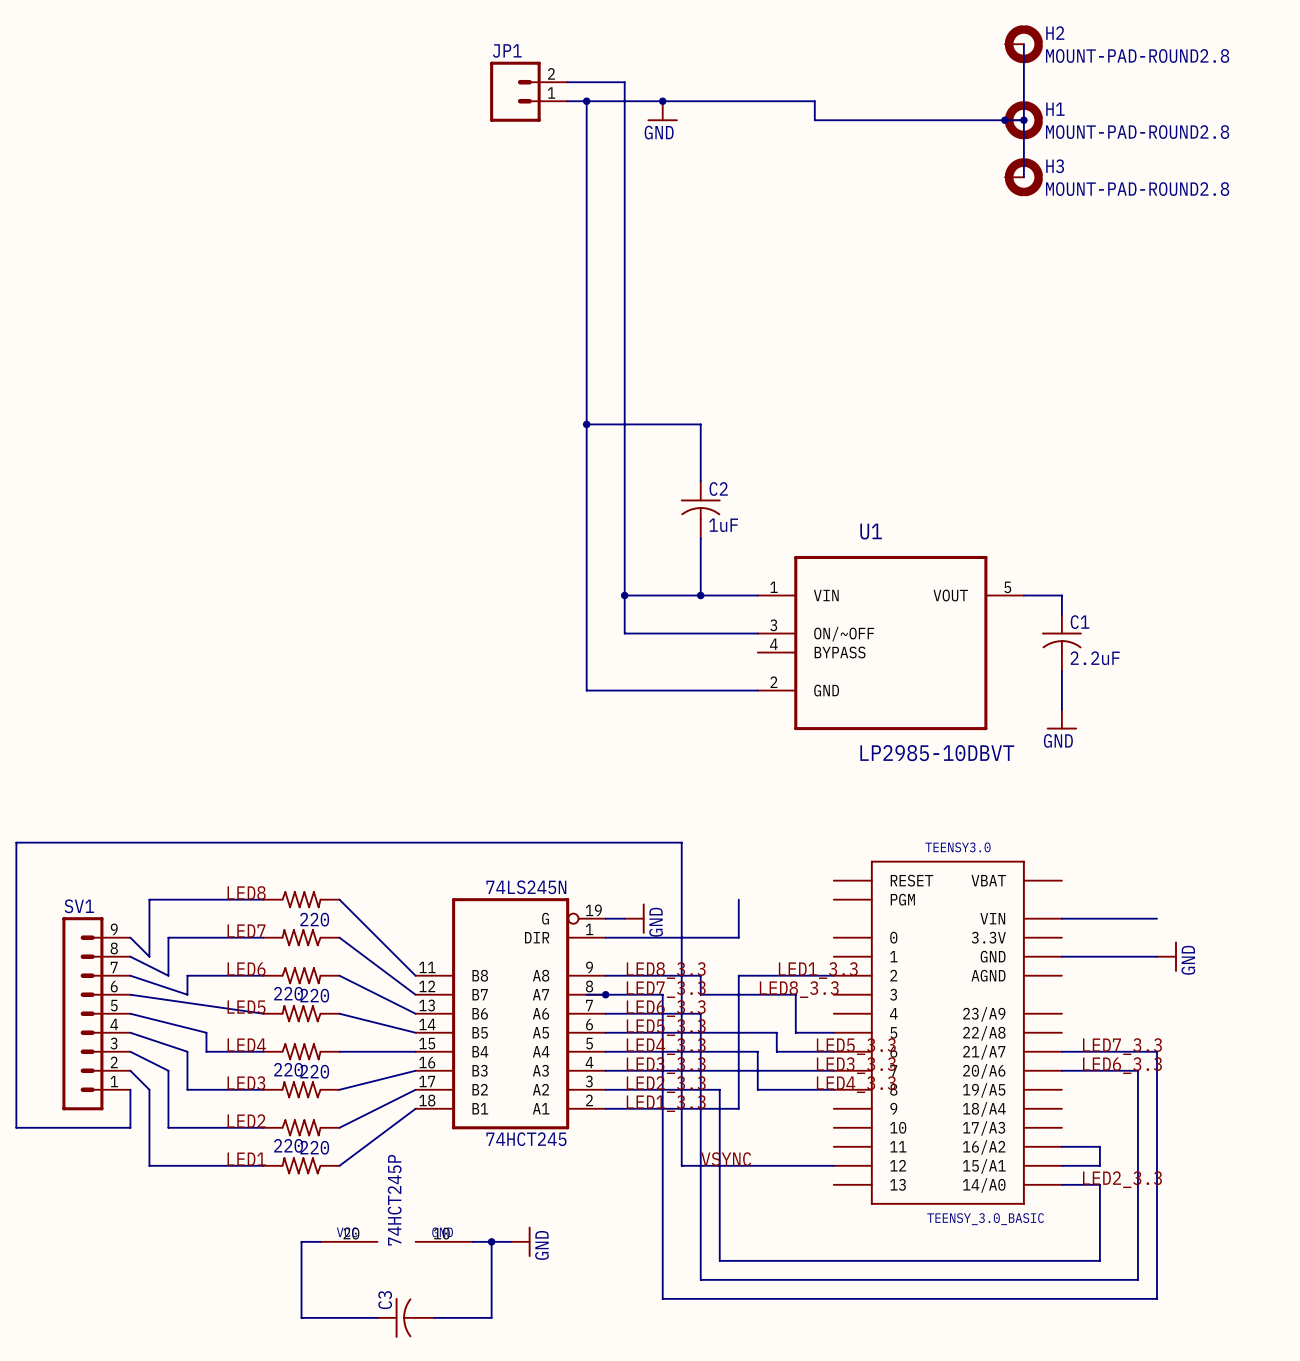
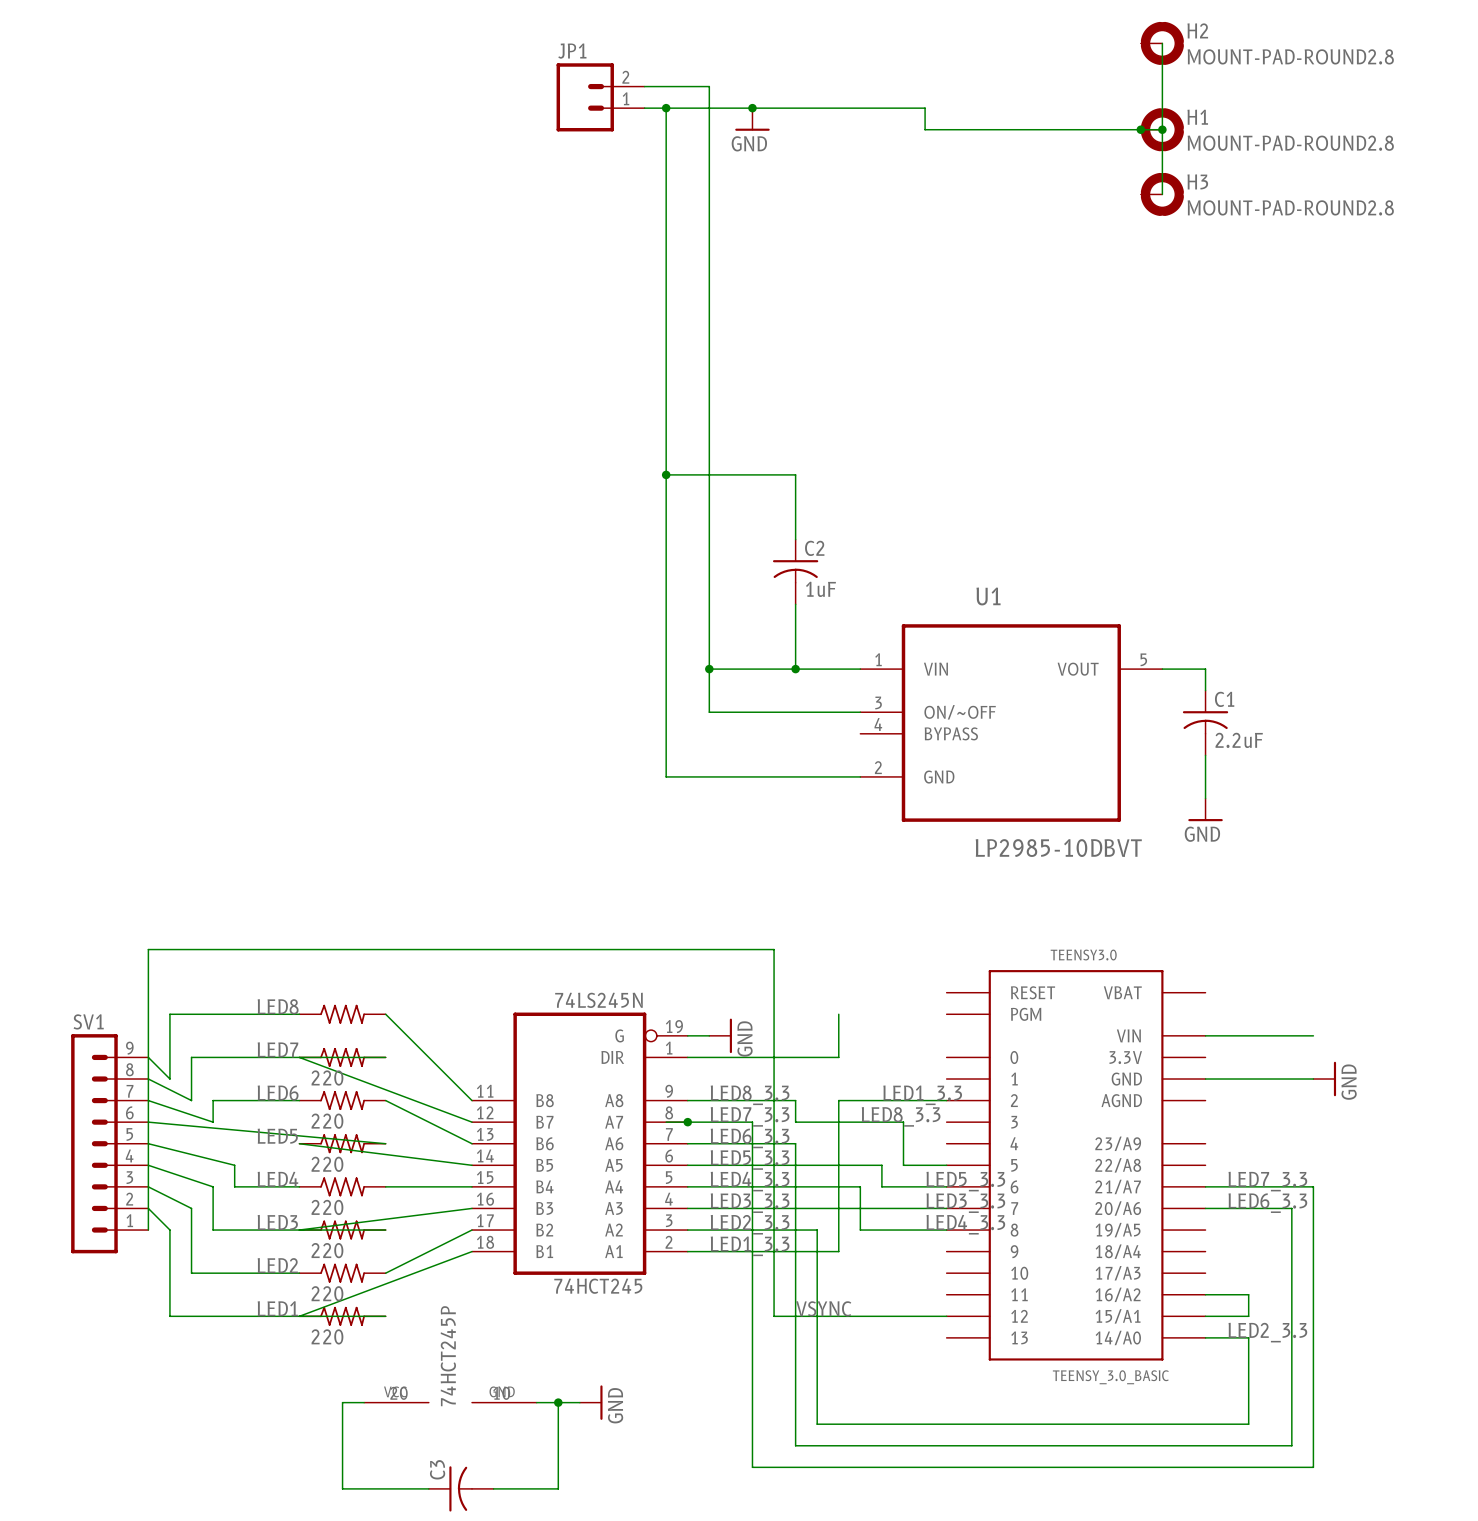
wire: (130, 842) (16, 842) (16, 1127) (130, 1127) (130, 1089) -> (148, 949) (148, 1230)
part rotation: 0° (301, 937) -> 180° (342, 1057)
wire: (339, 937) (415, 994) -> (385, 1057) (299, 1057) (472, 1122)
wire: (130, 994) (263, 1013) -> (148, 1122) (385, 1143)
part rotation: 0° (301, 1013) -> 180° (342, 1143)
wire: (339, 1013) (415, 1032) -> (299, 1143) (472, 1165)
wire: (415, 1070) (339, 1089) -> (472, 1208) (299, 1230) (385, 1230)
part rotation: 0° (301, 1089) -> 180° (342, 1230)
wire: (415, 1108) (339, 1165) -> (472, 1251) (299, 1316) (385, 1316)
part rotation: 0° (301, 1165) -> 180° (342, 1316)

